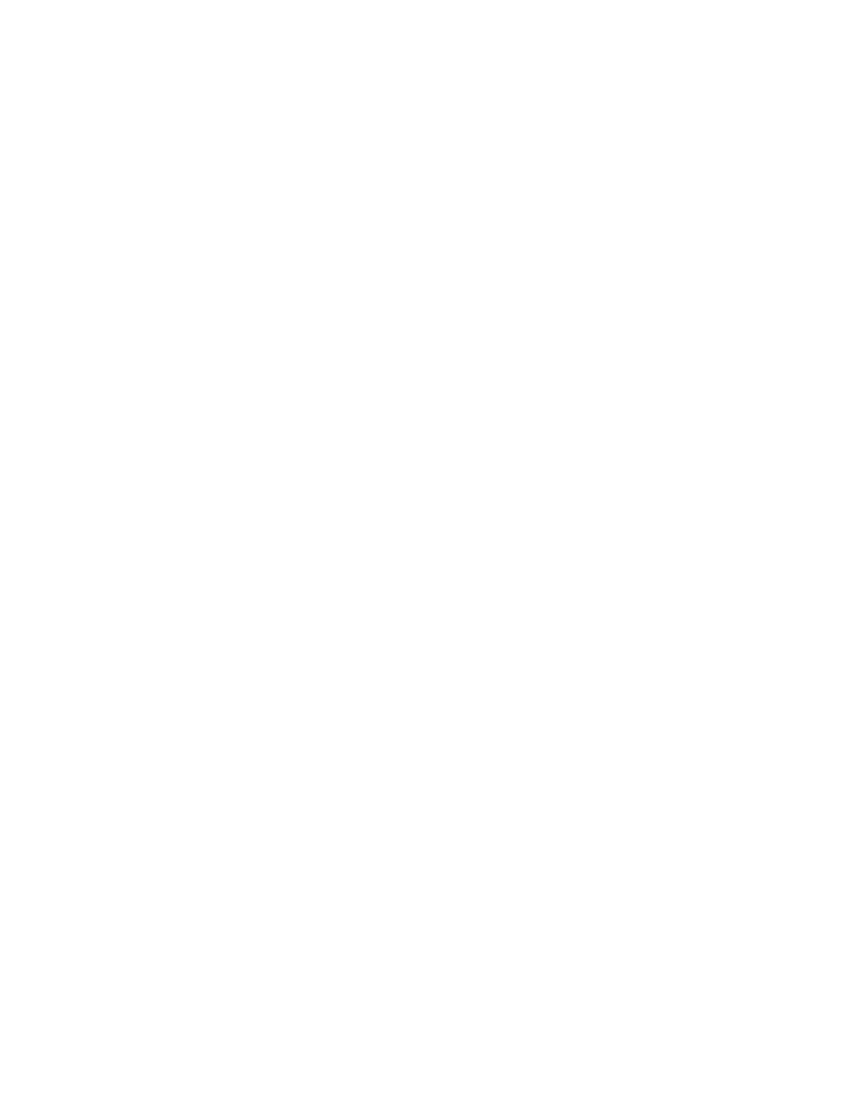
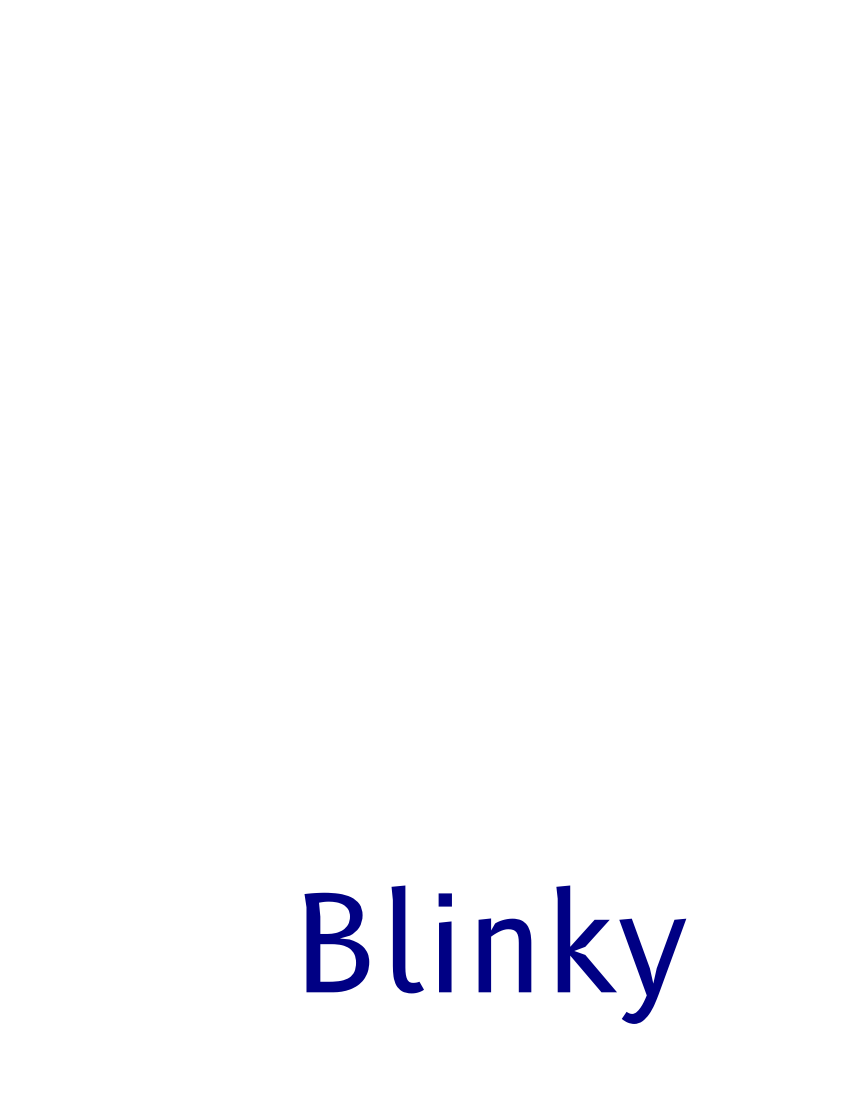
text: none -> Blinky (495, 954)

